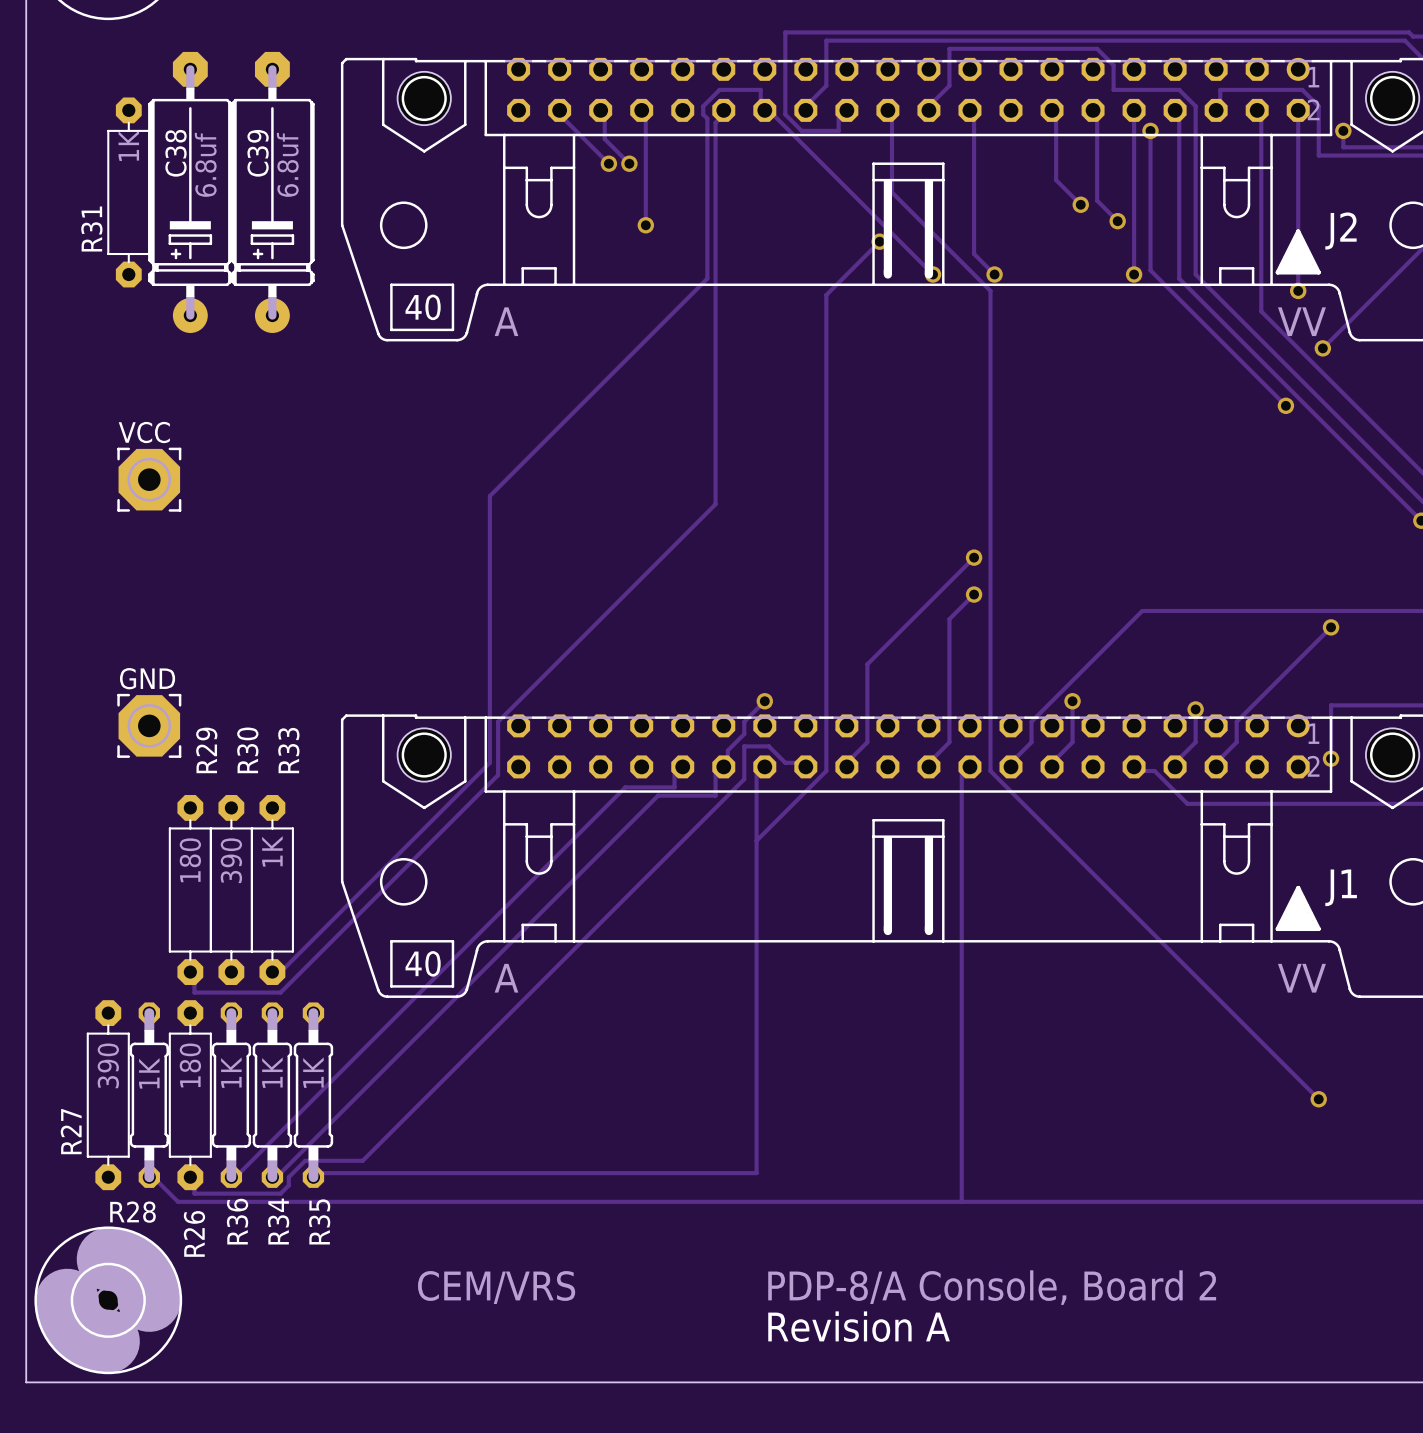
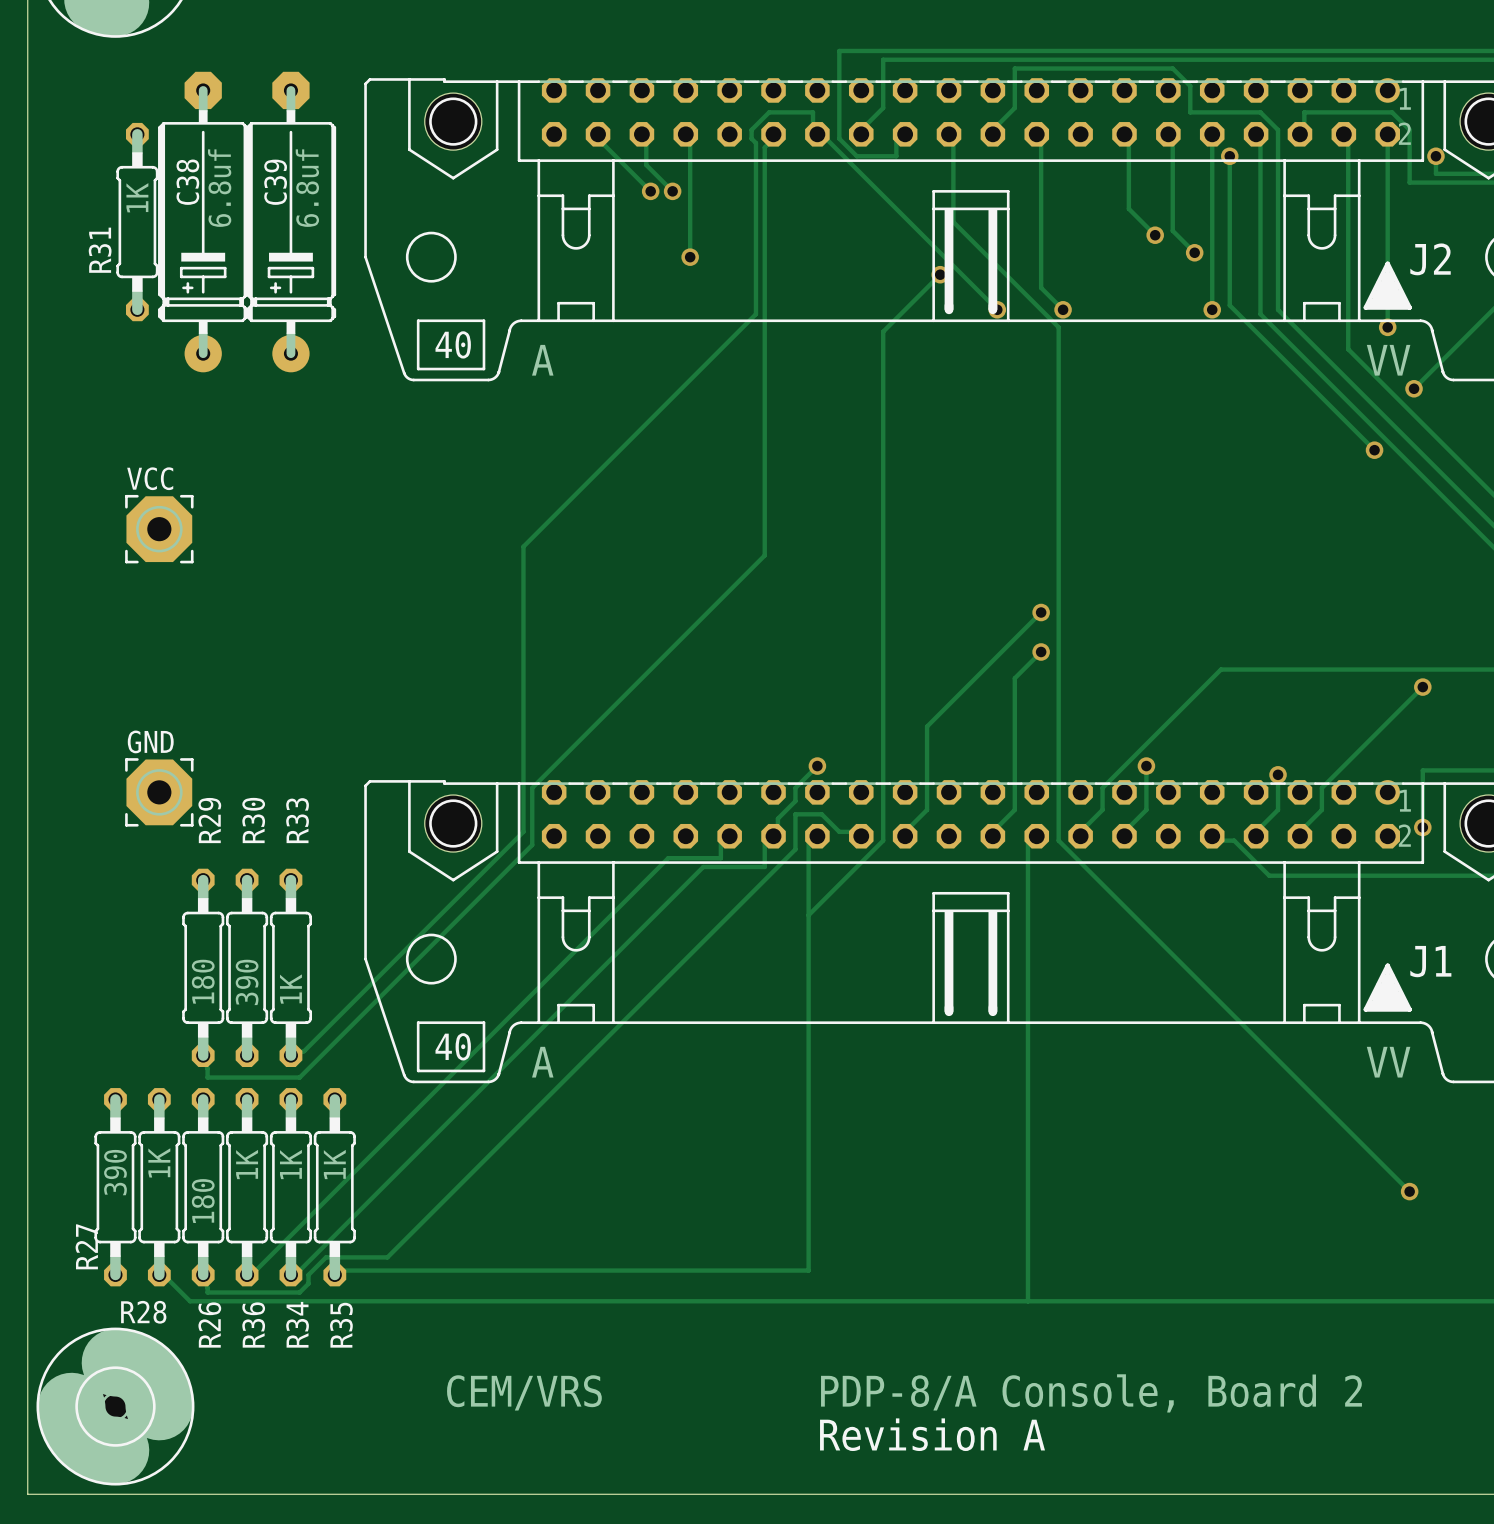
R31 footprint: [107, 97, 151, 288] -> [116, 122, 159, 322]
R31 value position: 1K (128, 145) -> 1K (137, 197)
R29 footprint: [168, 795, 212, 985] -> [182, 868, 225, 1068]
R30 footprint: [209, 795, 253, 985] -> [226, 868, 269, 1068]
R33 footprint: [250, 795, 294, 985] -> [269, 868, 313, 1068]
R33 value position: 1K (272, 851) -> 1K (290, 989)
R27 footprint: [86, 1000, 130, 1191] -> [94, 1088, 137, 1287]
R26 footprint: [168, 1000, 212, 1191] -> [182, 1088, 225, 1287]
R27 name position: R27 (71, 1131) -> R27 (86, 1246)

